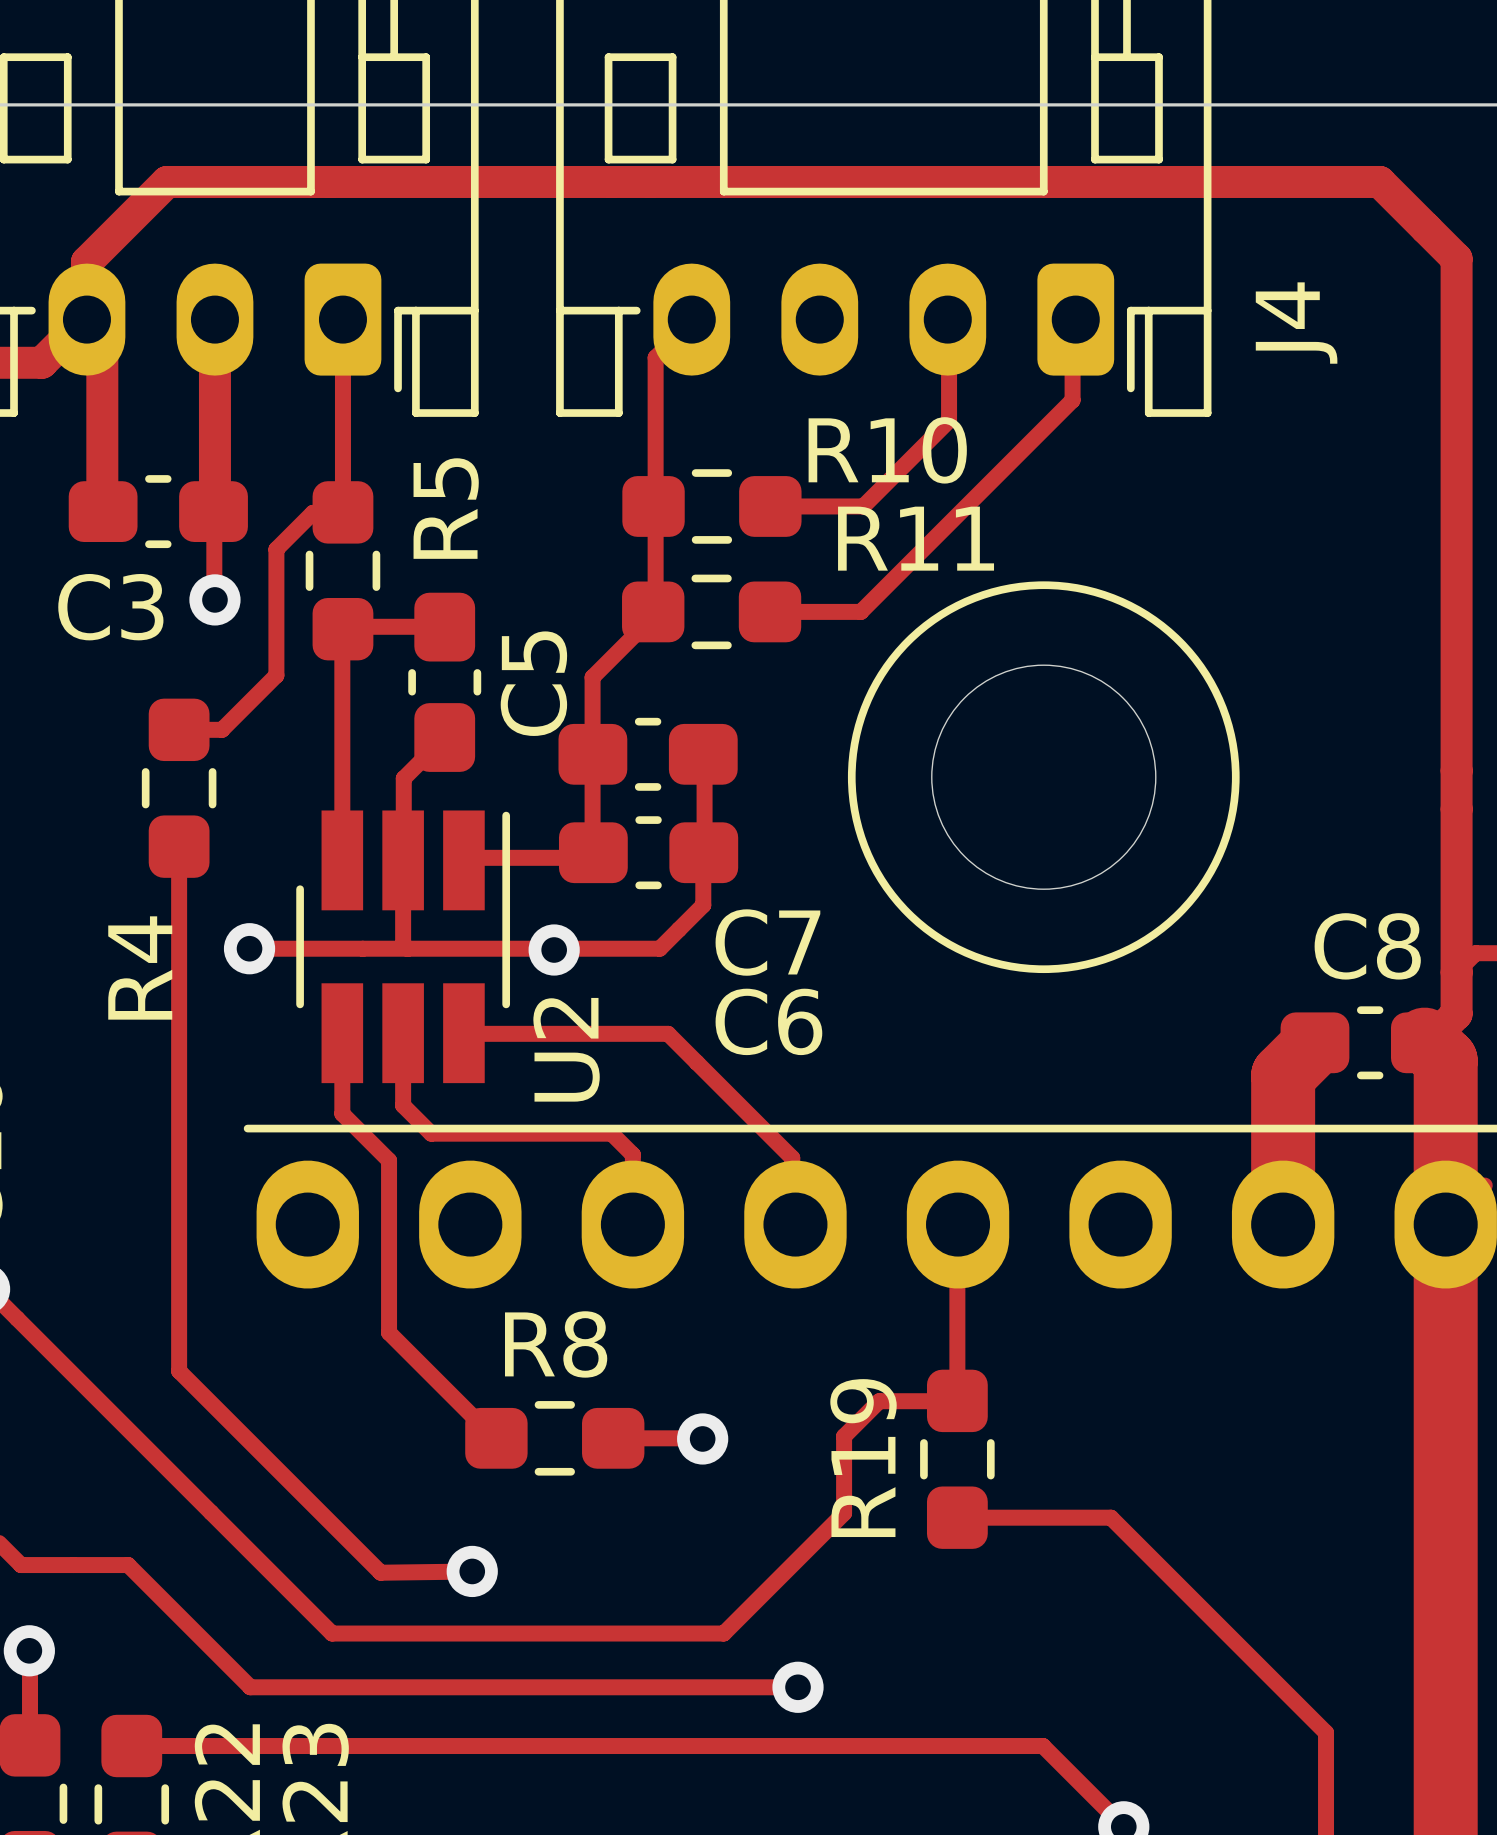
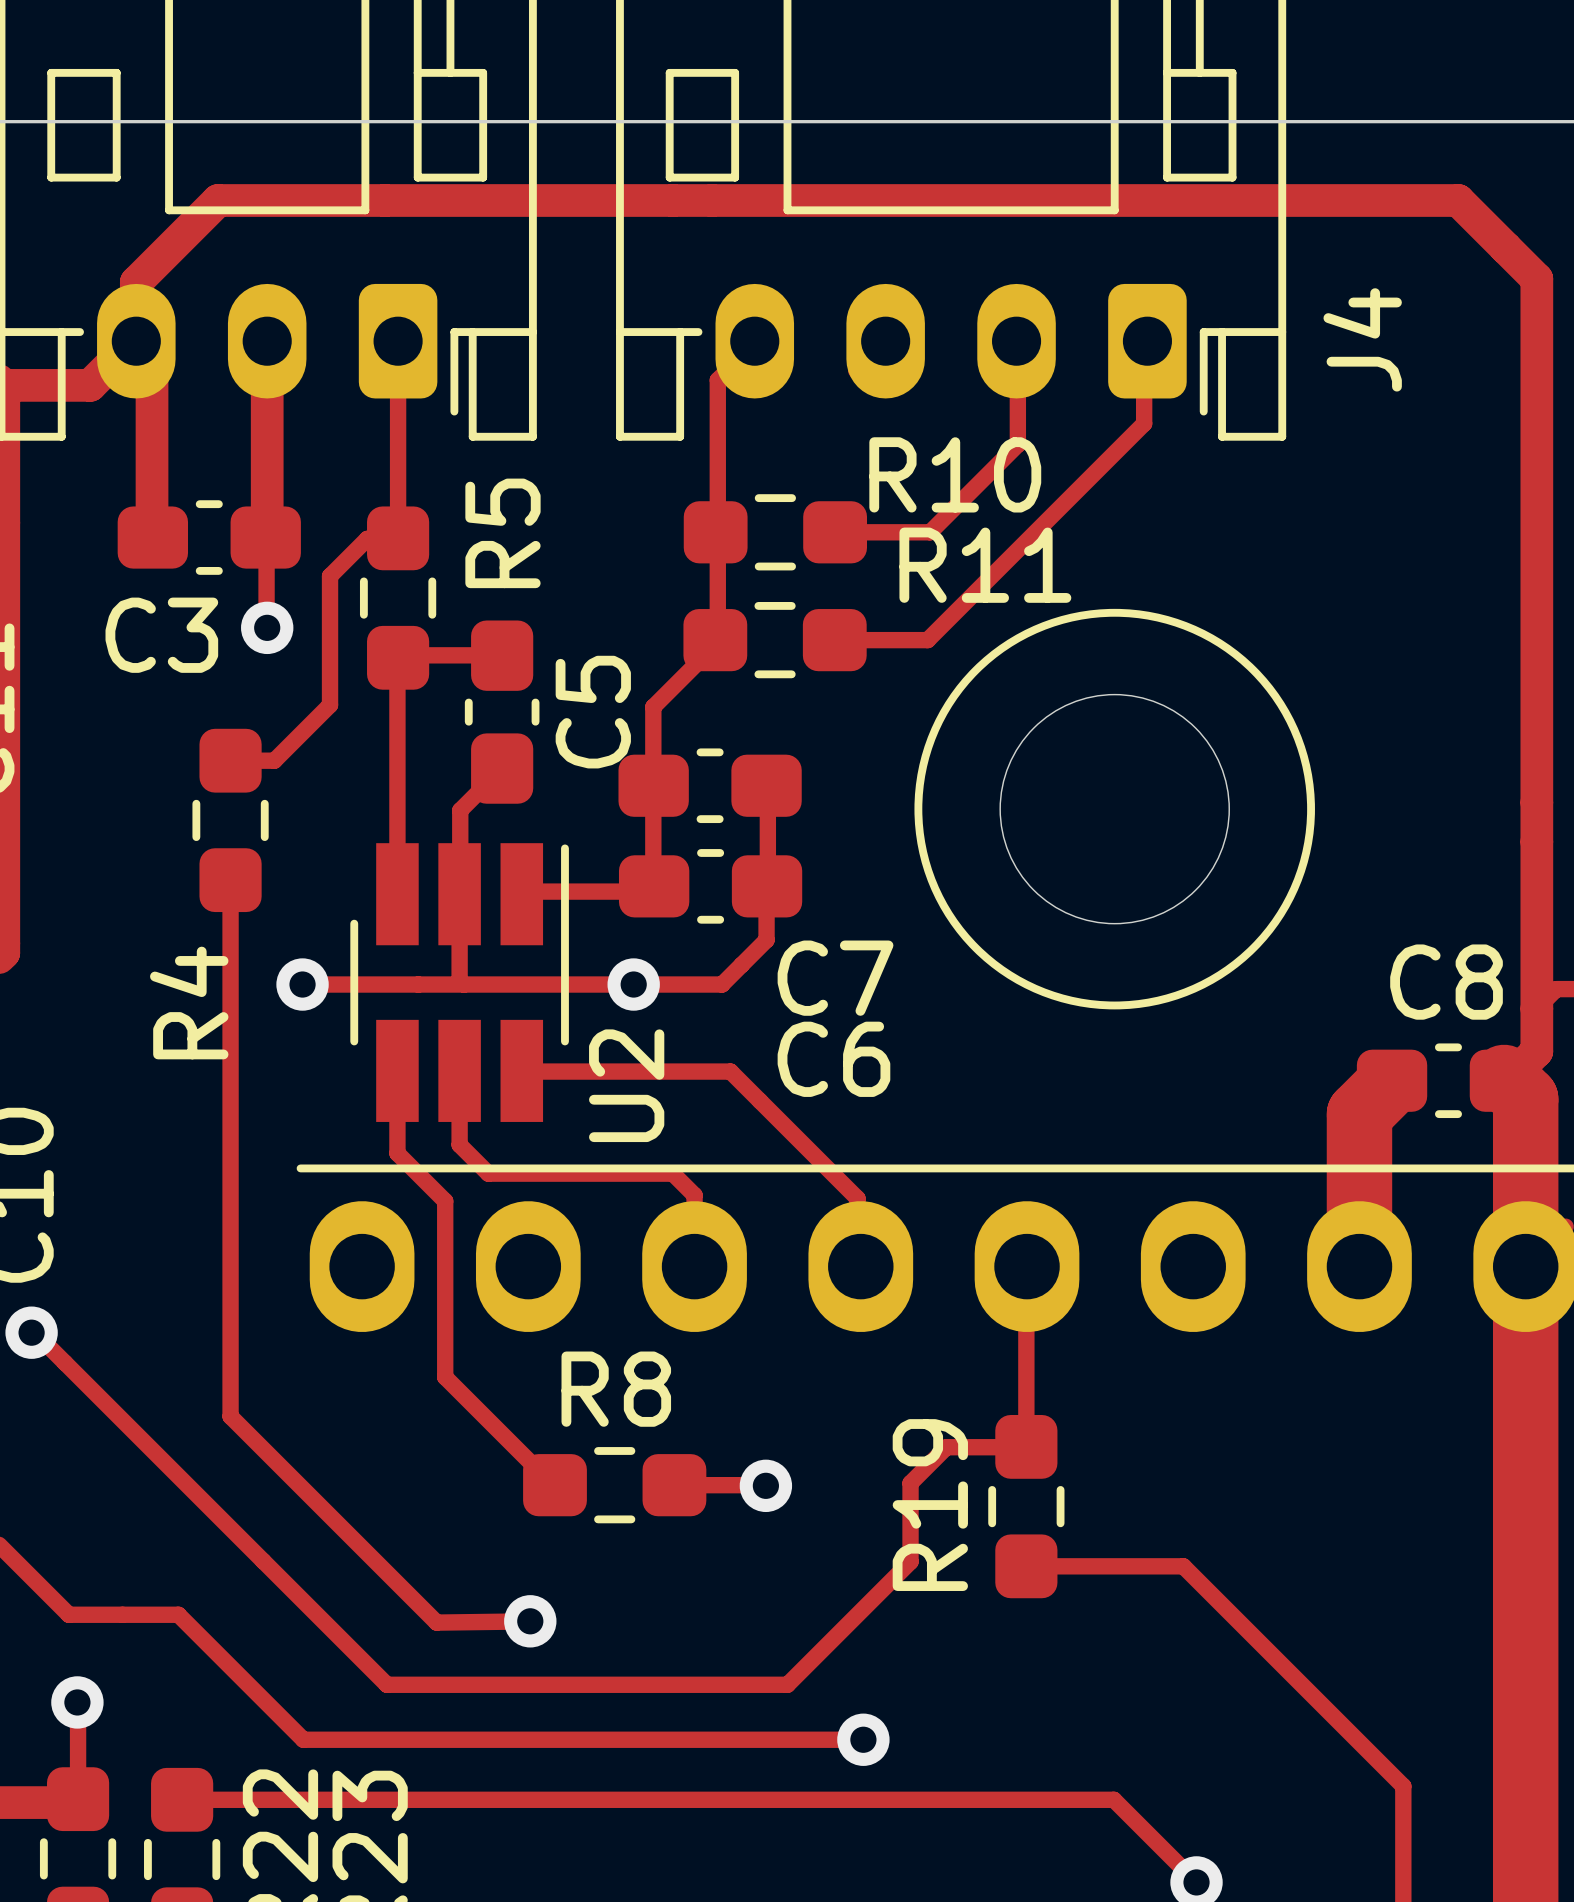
via position: (554, 950) -> (633, 984)

